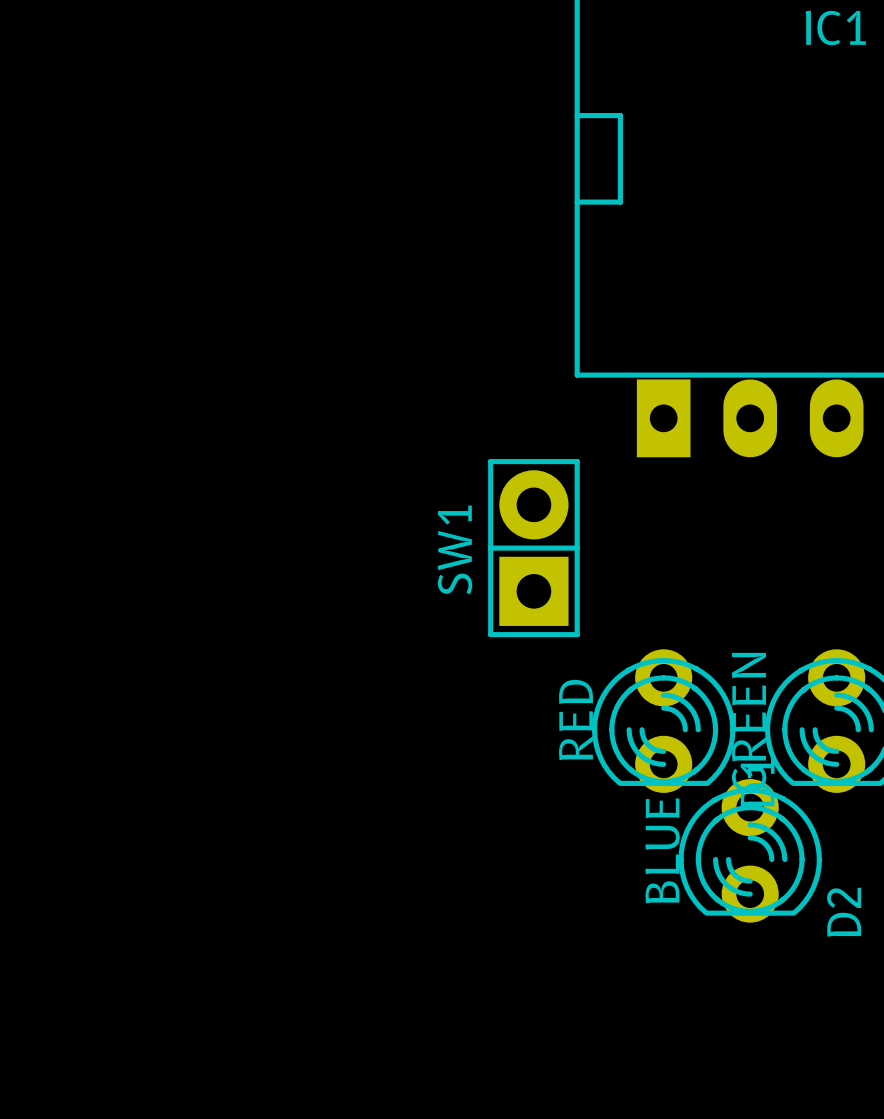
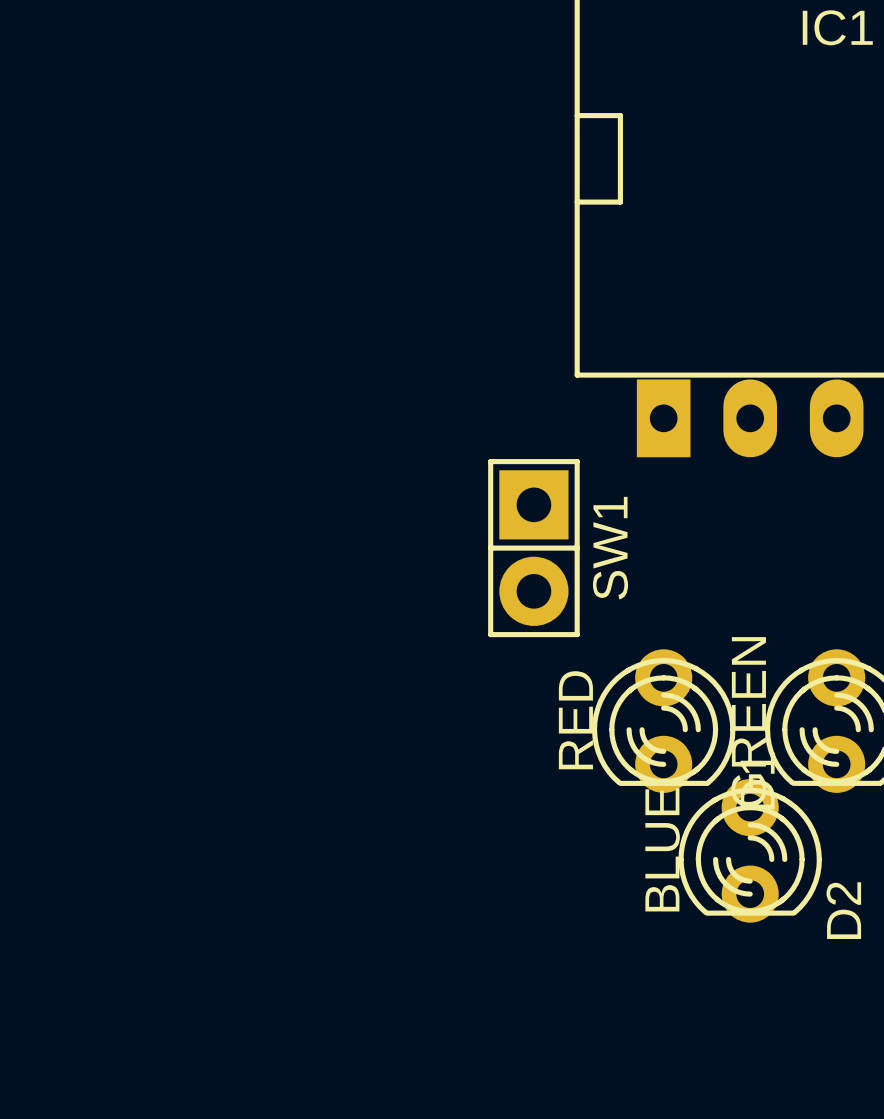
SW1 rotation: 0° (533, 548) -> 180° (533, 548)

